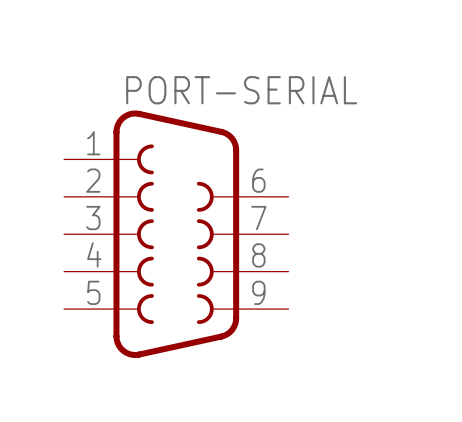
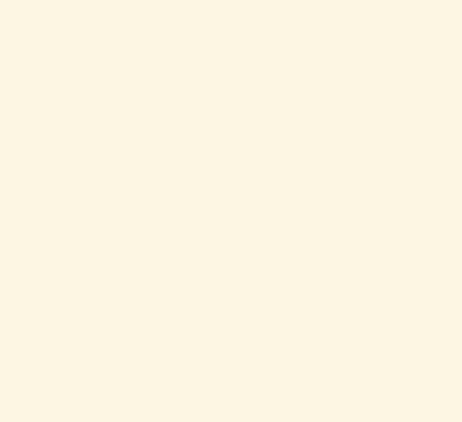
PORT-SERIAL: (176, 234) -> none

